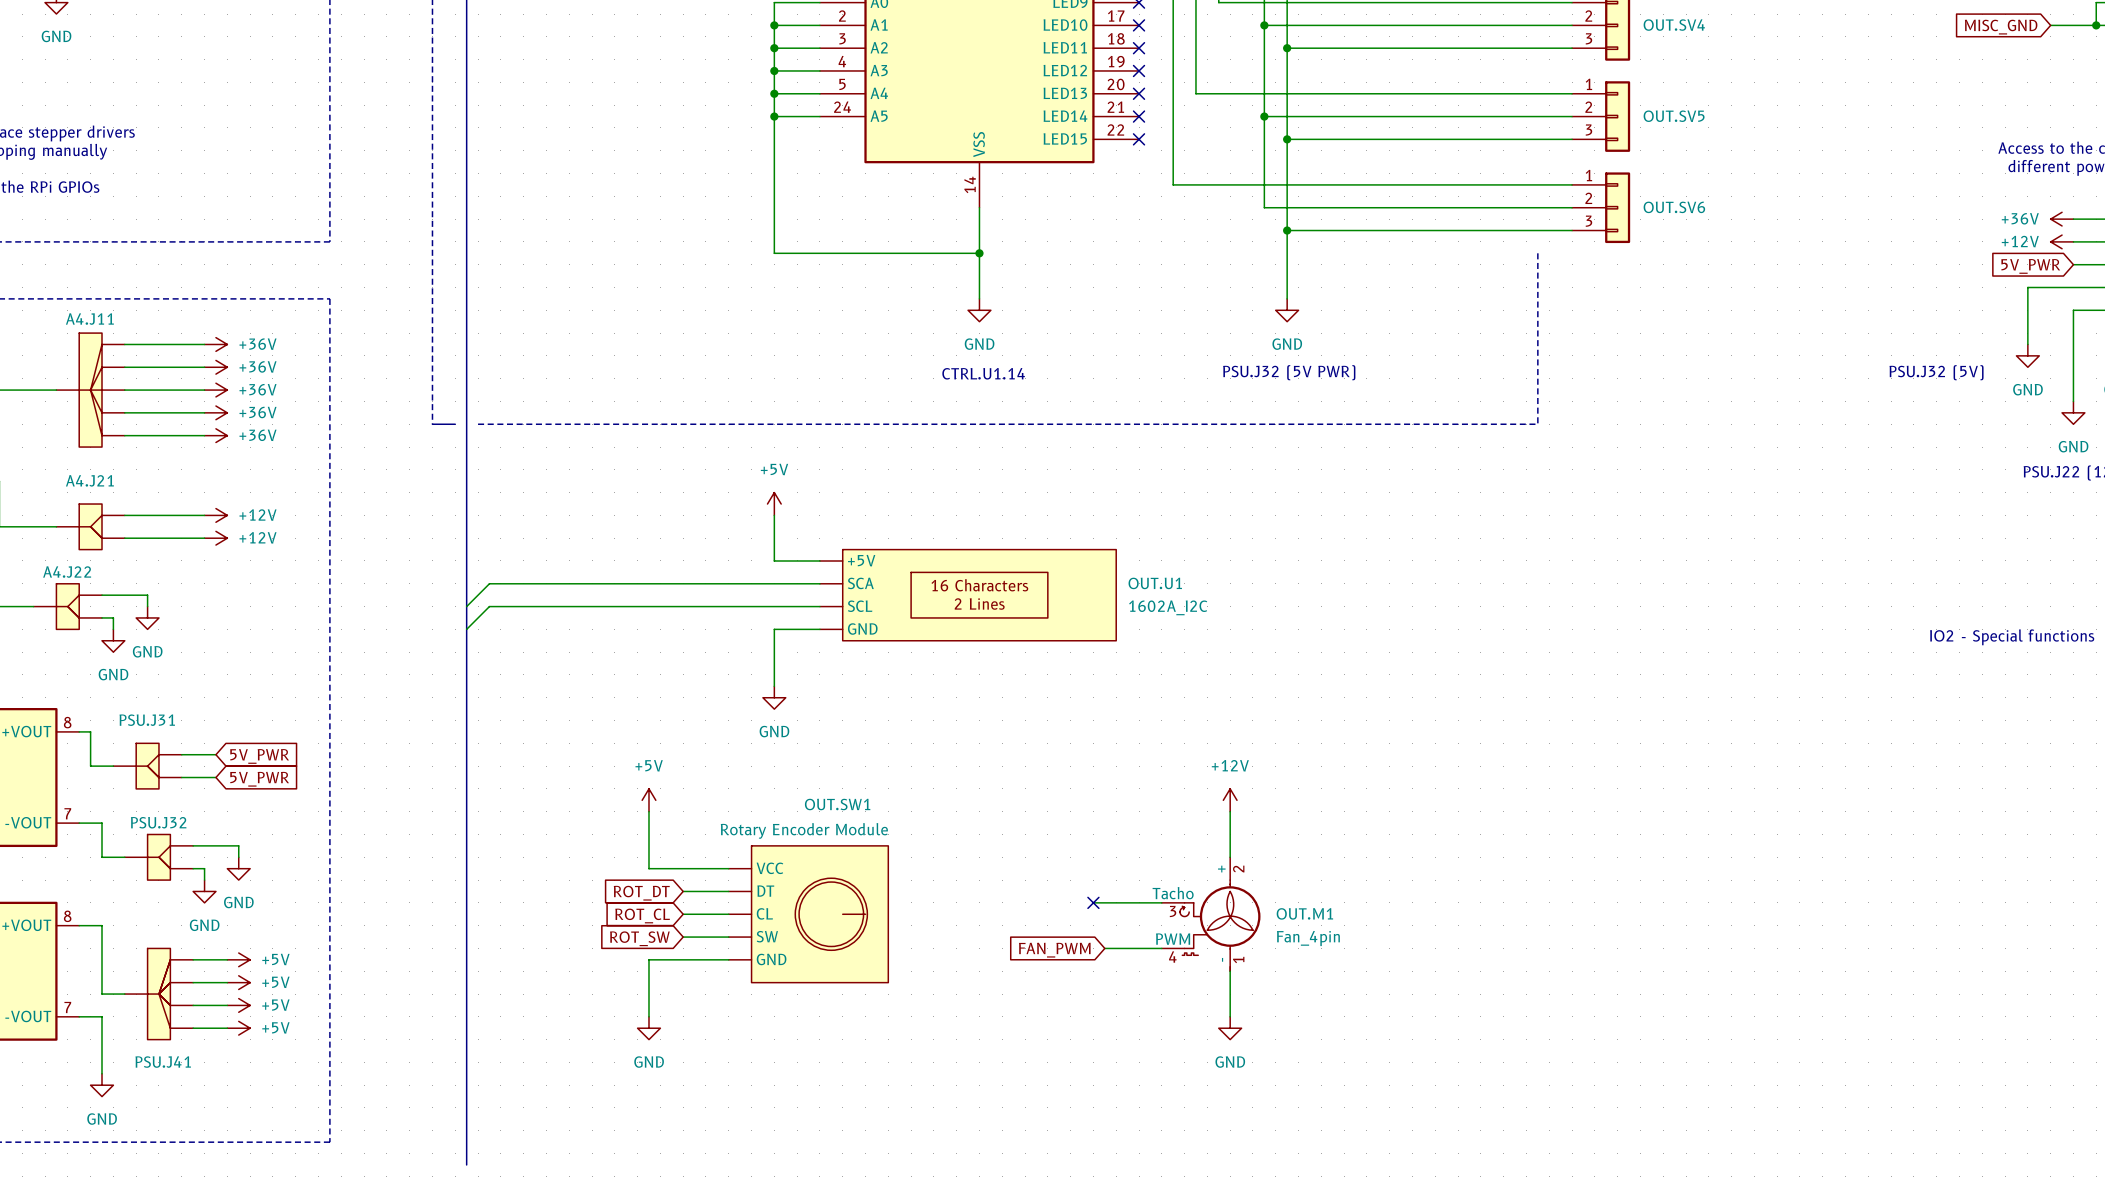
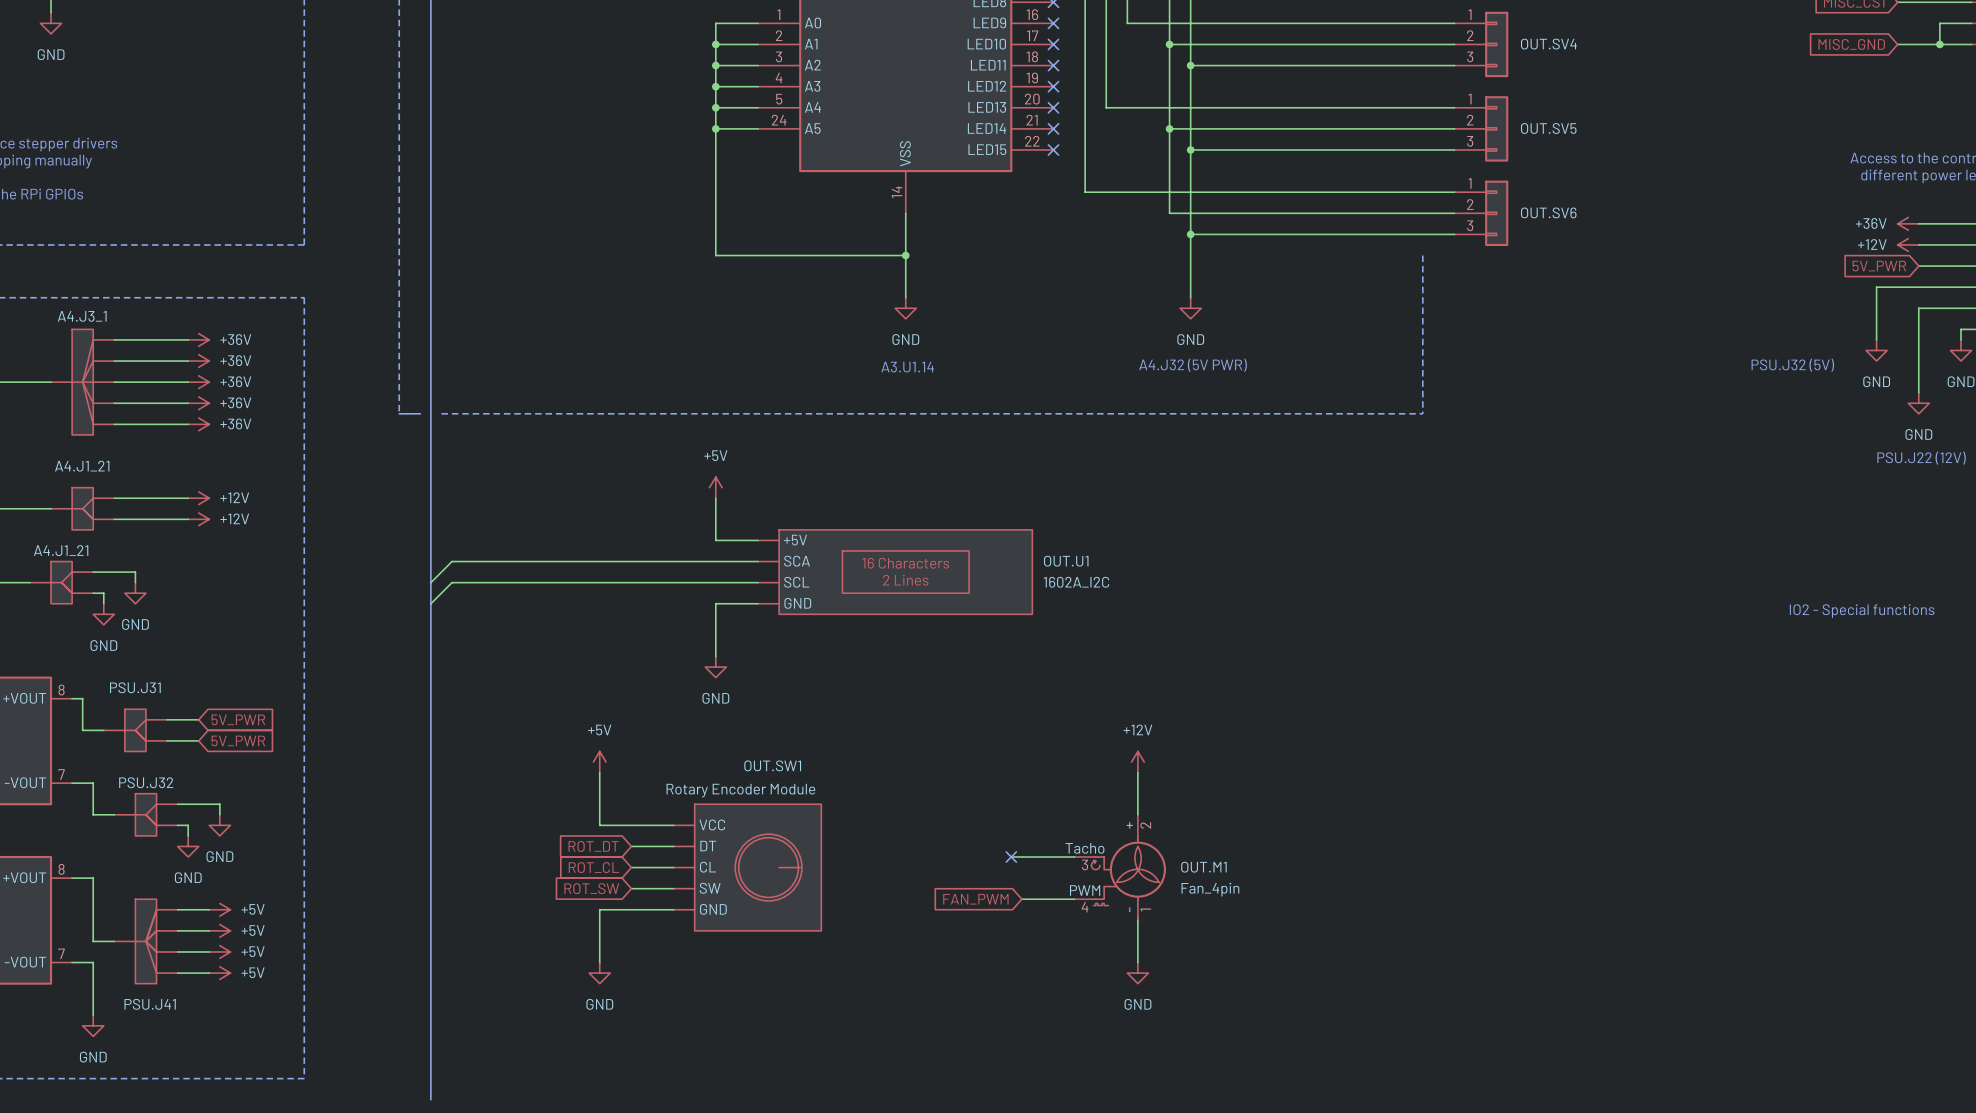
A4.J11 name: A4.J11 (89, 319) -> A4.J3_1 (82, 316)
text: PSU.J32 (5V PWR) (1289, 372) -> A4.J32 (5V PWR) (1193, 365)
text: CTRL.U1.14 (983, 373) -> A3.U1.14 (907, 367)
A4.J21 name: A4.J21 (89, 480) -> A4.J1_21 (82, 466)
A4.J22 name: A4.J22 (67, 572) -> A4.J1_21 (61, 550)

